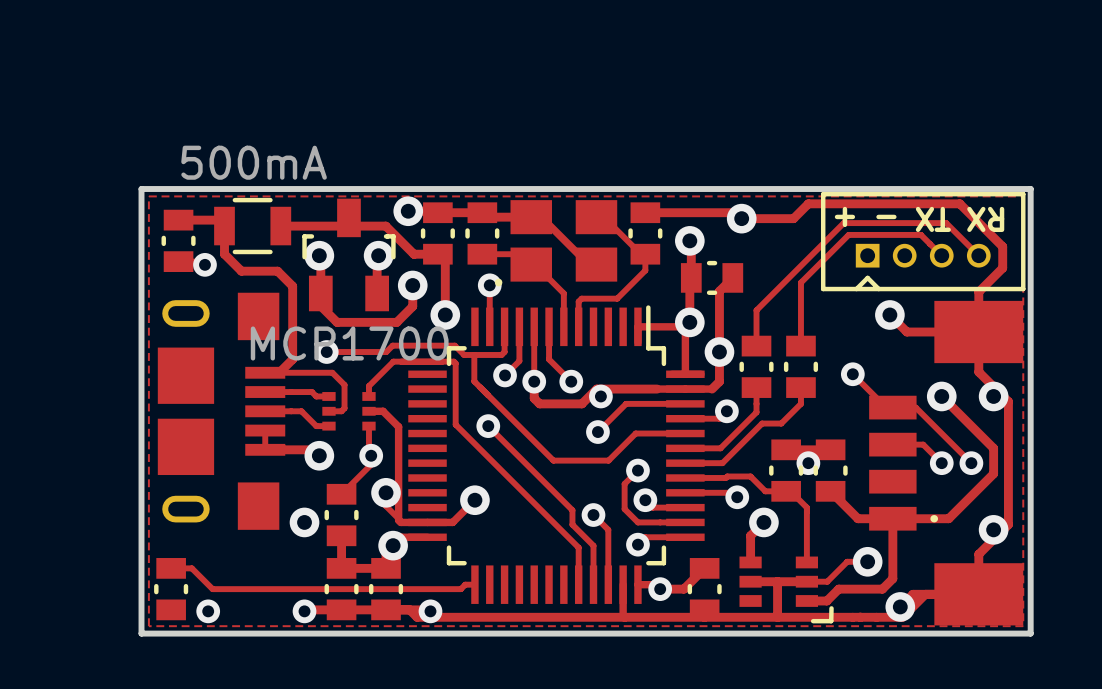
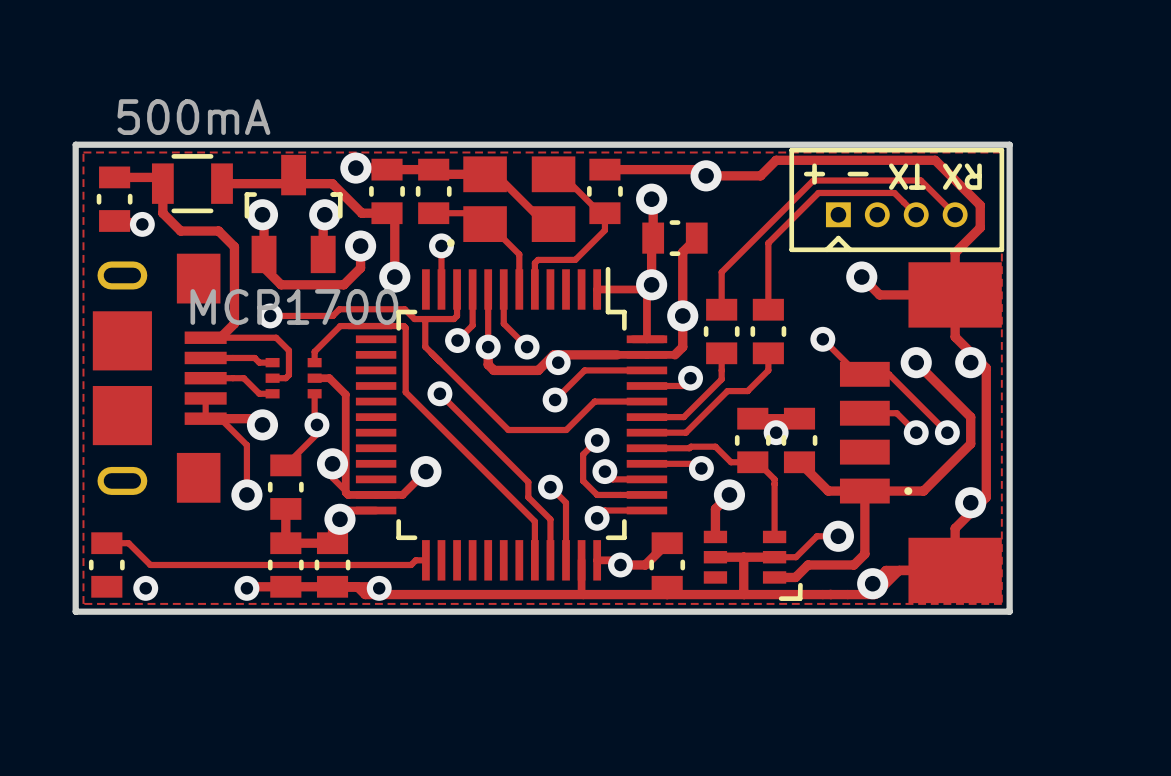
track: none -> (205, 418) (220, 418) (246, 445) (246, 494)

